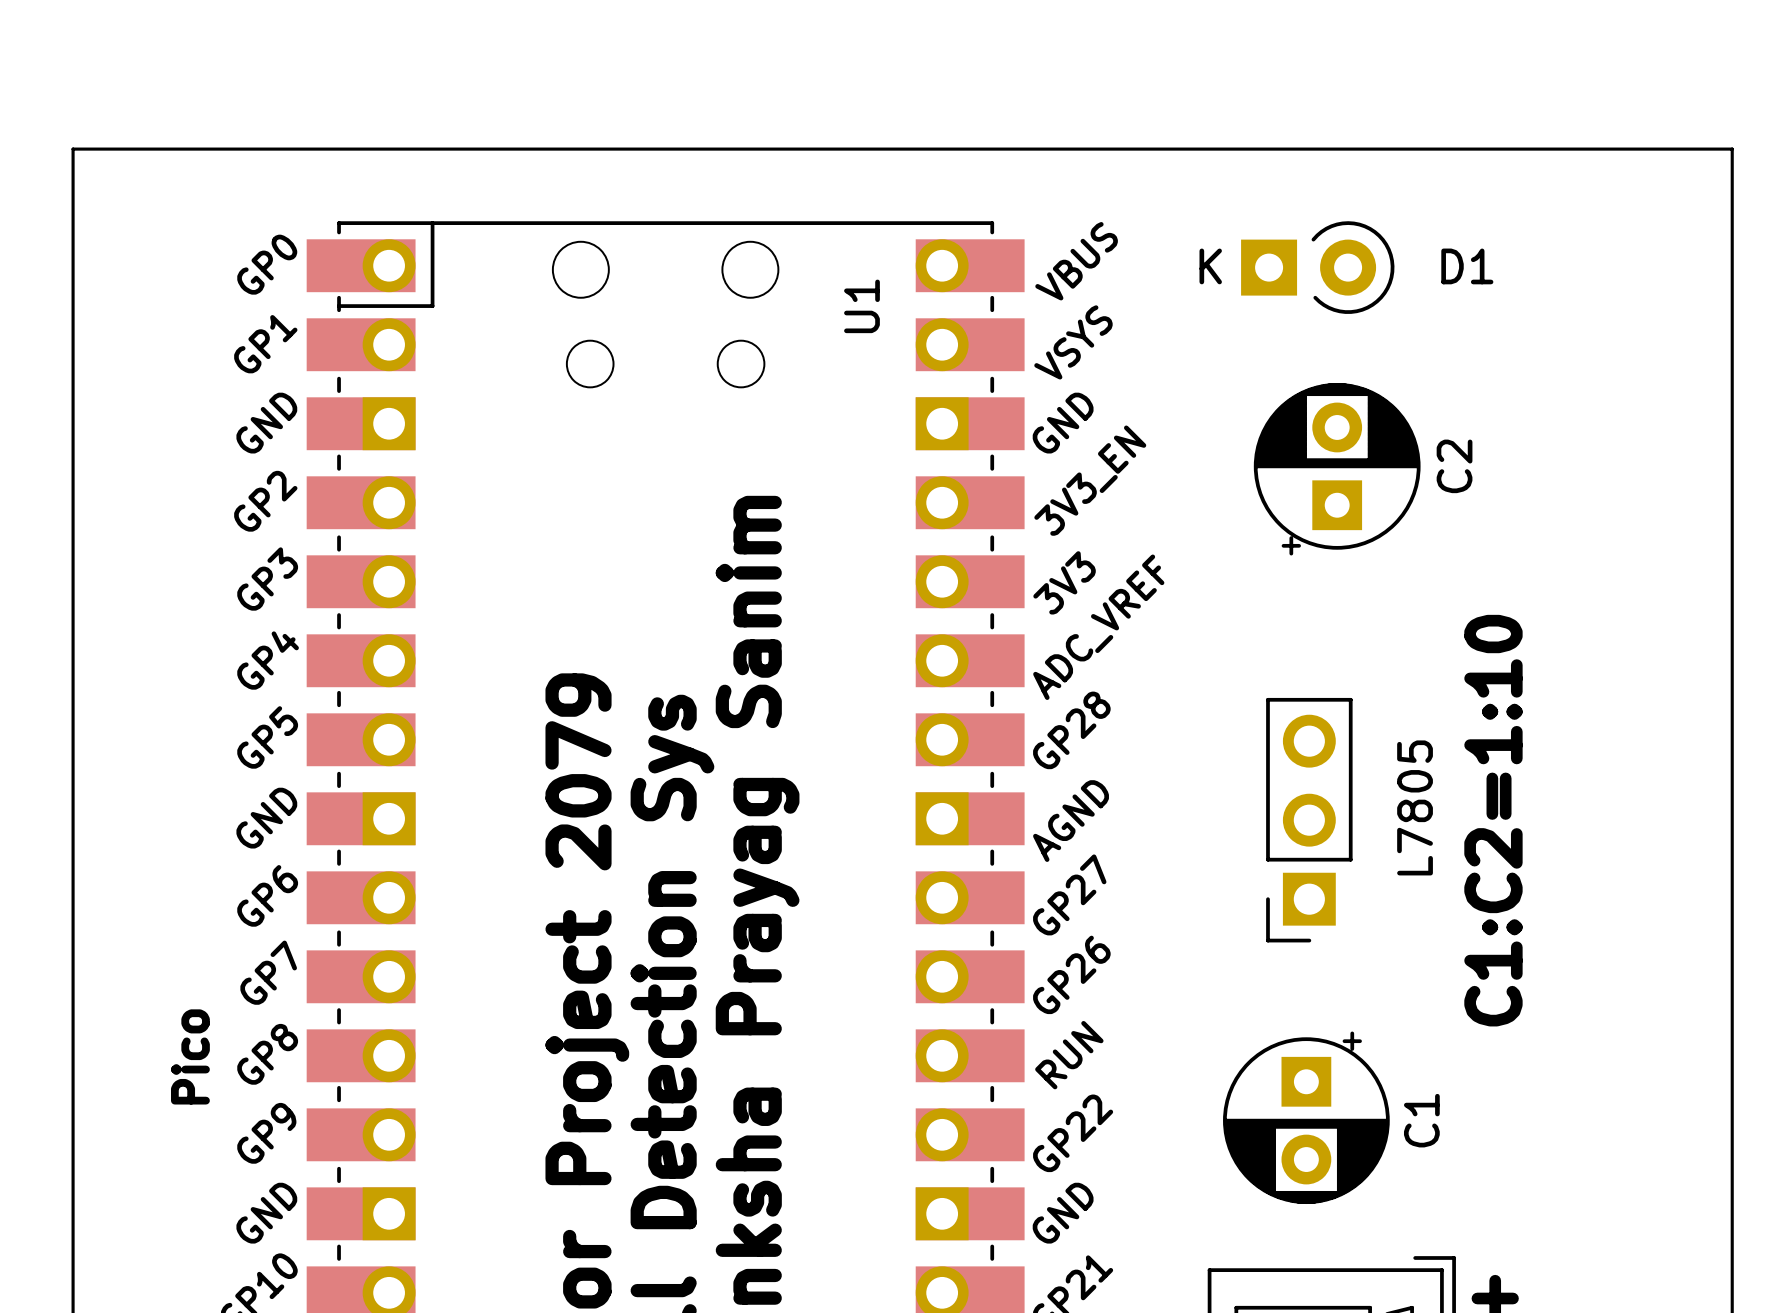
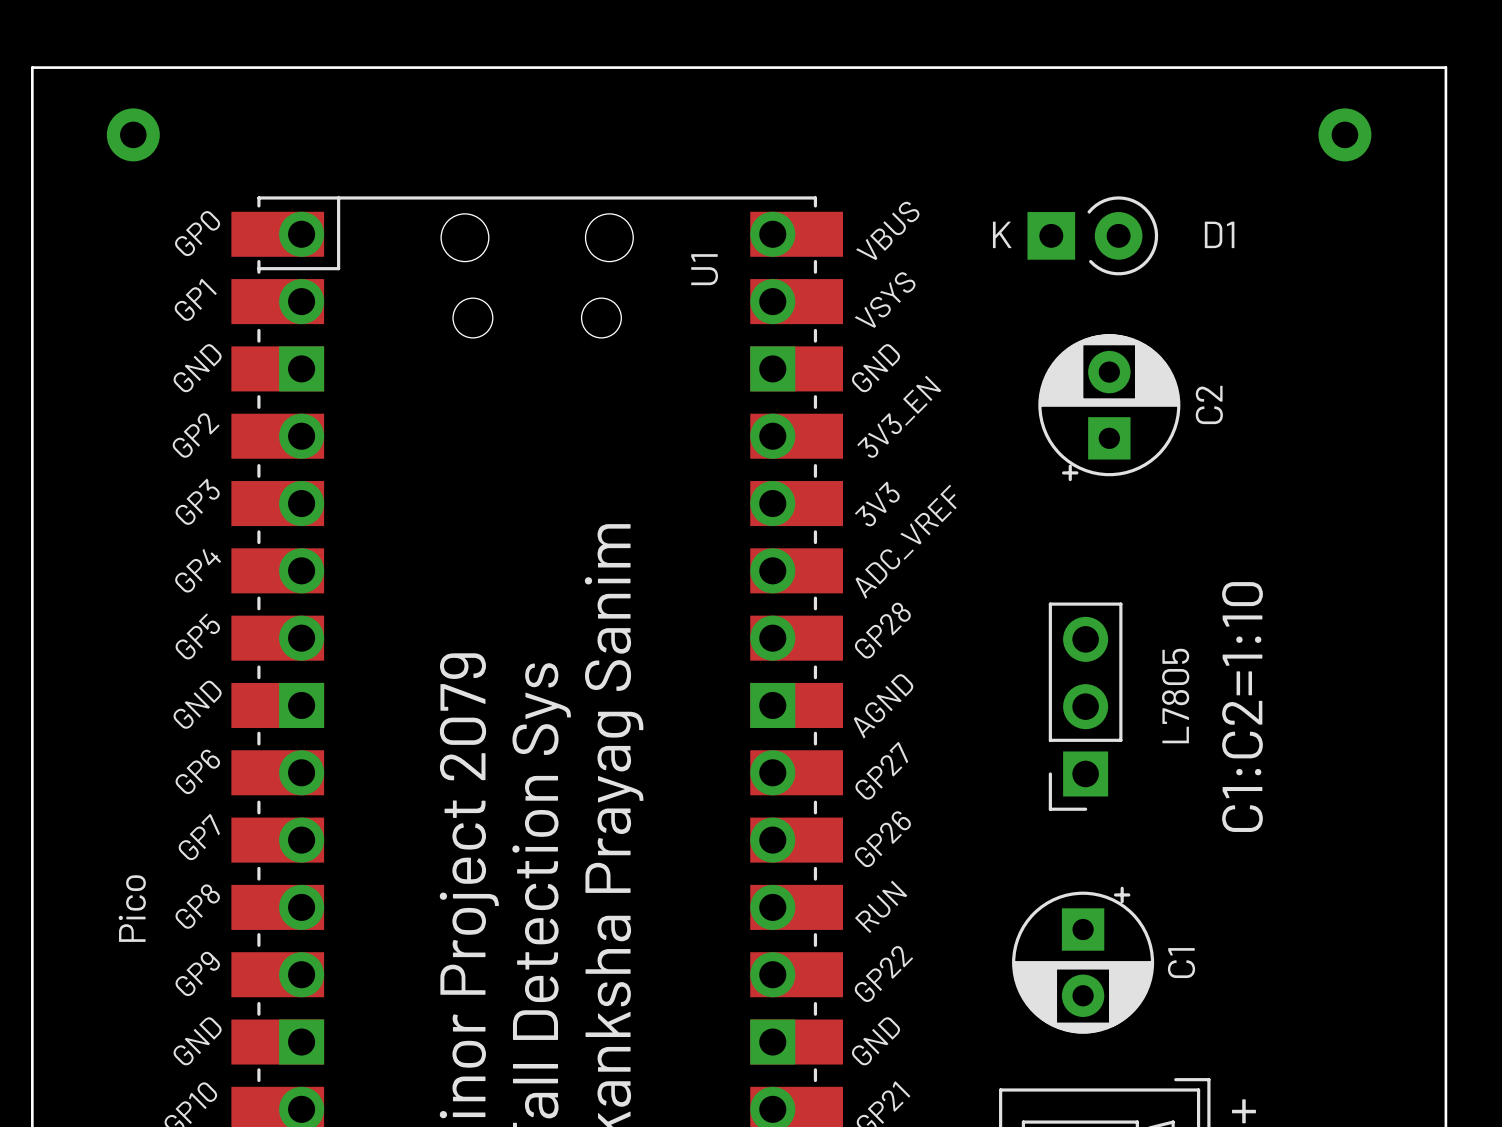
board edge: (73, 149) (1732, 149) -> (32, 134) (32, 67) (1445, 67) (1445, 134)
via: none -> (133, 134)
via: none -> (1344, 134)

